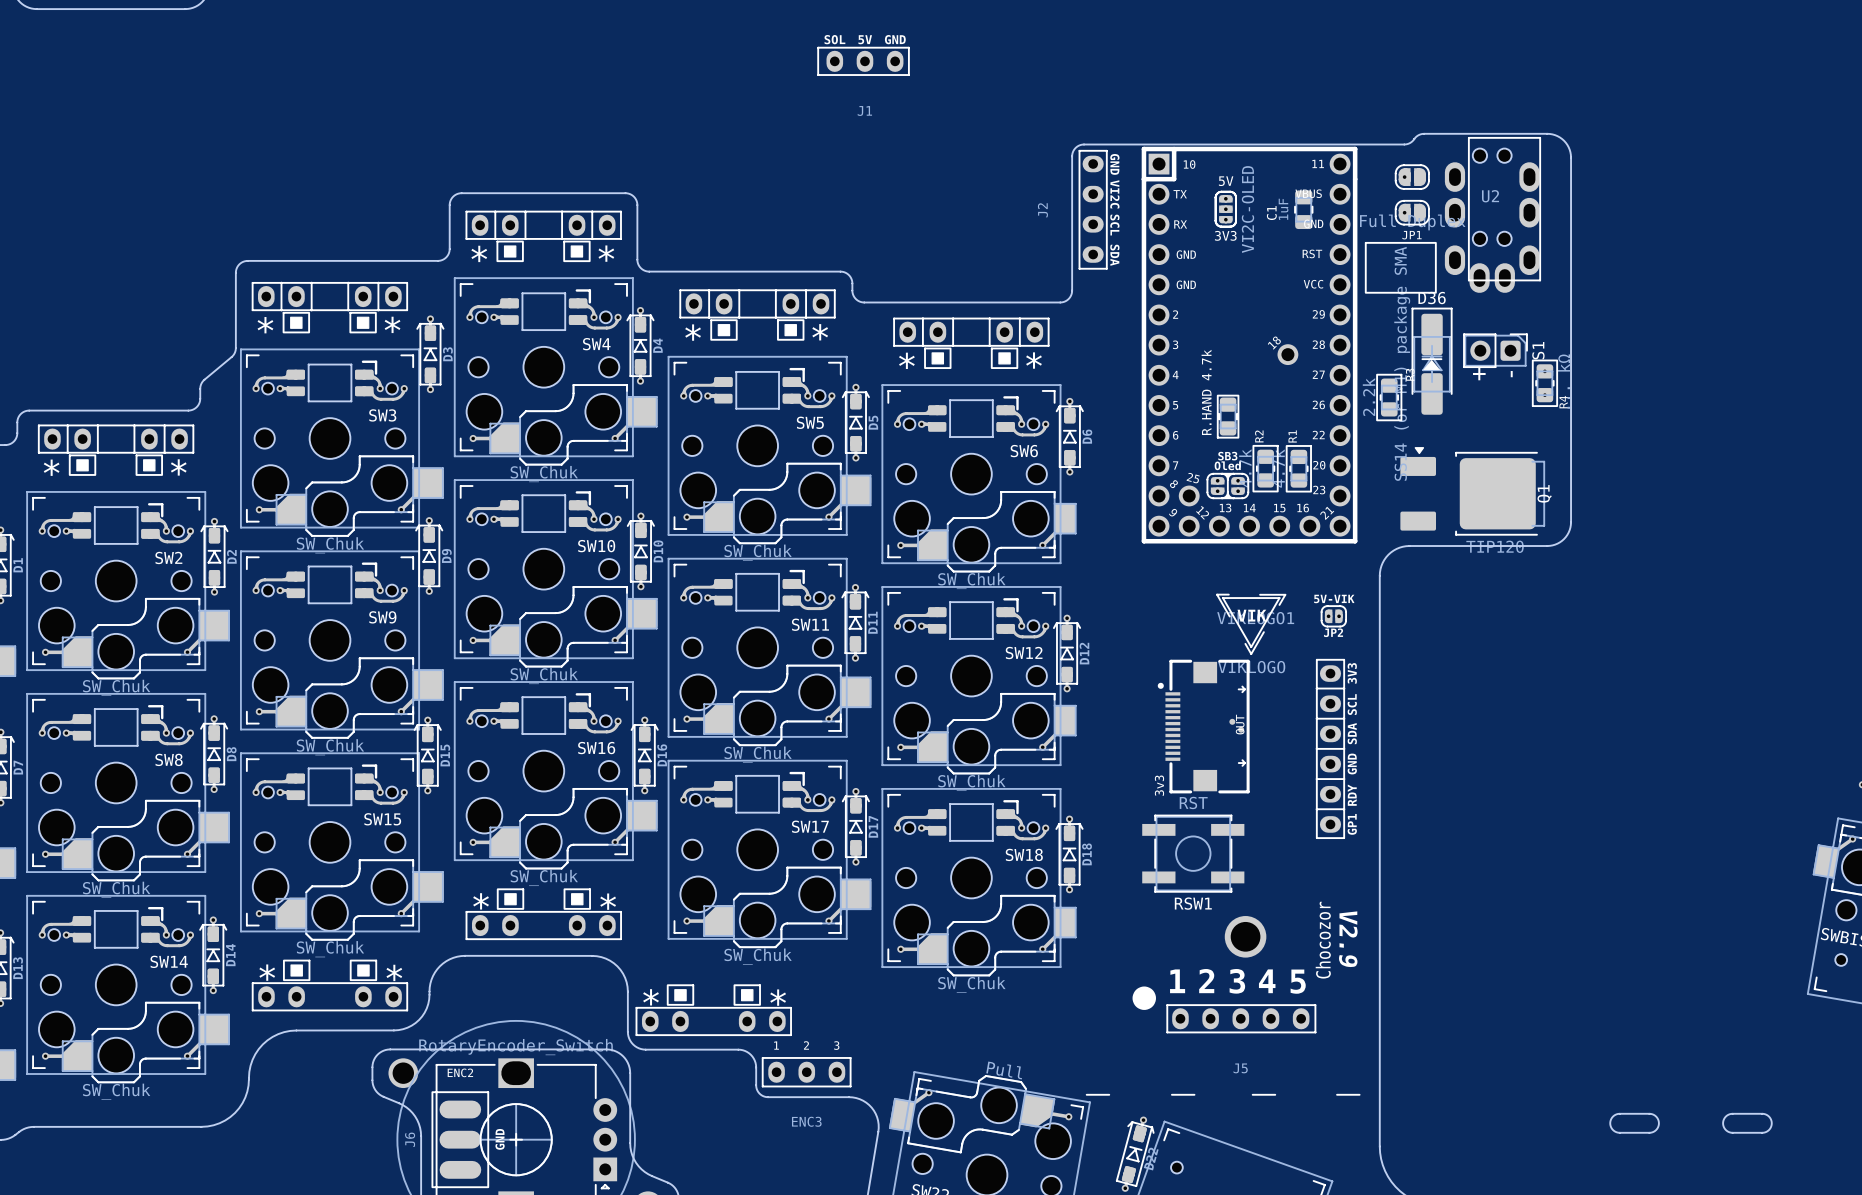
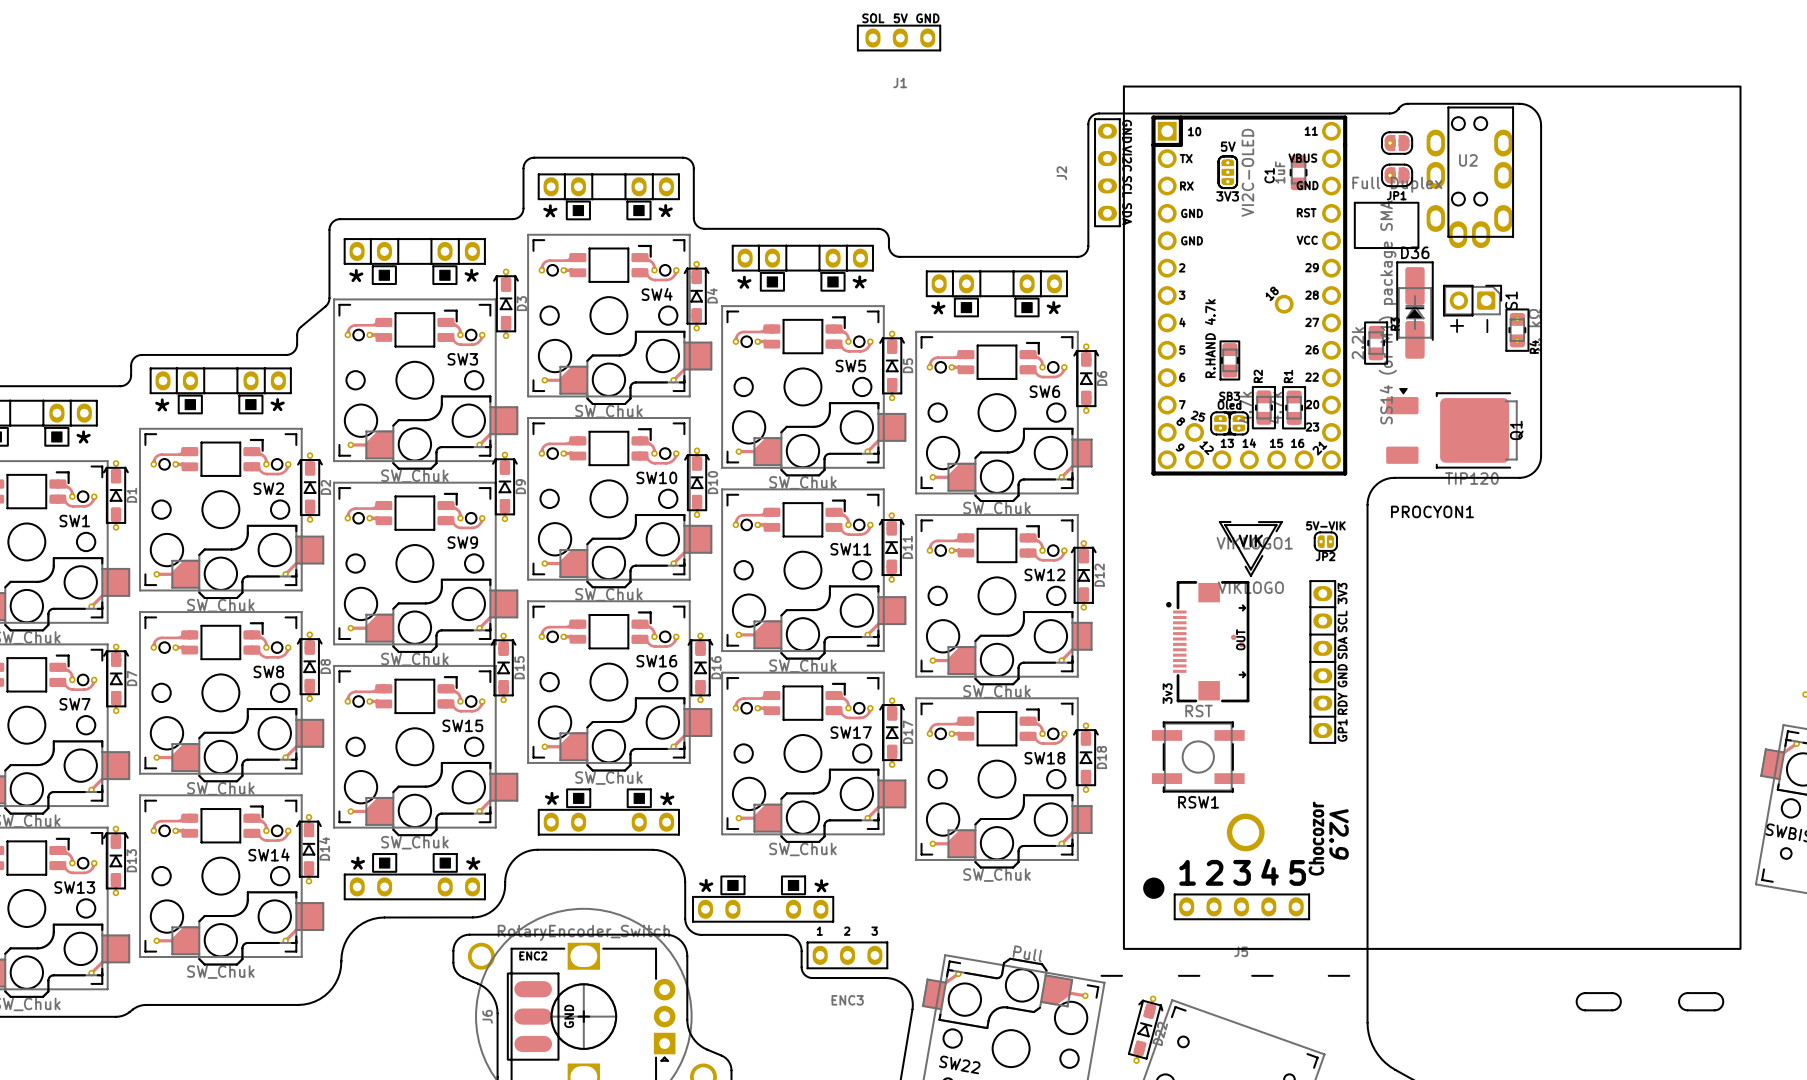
PROCYON1: none -> (1432, 517)

